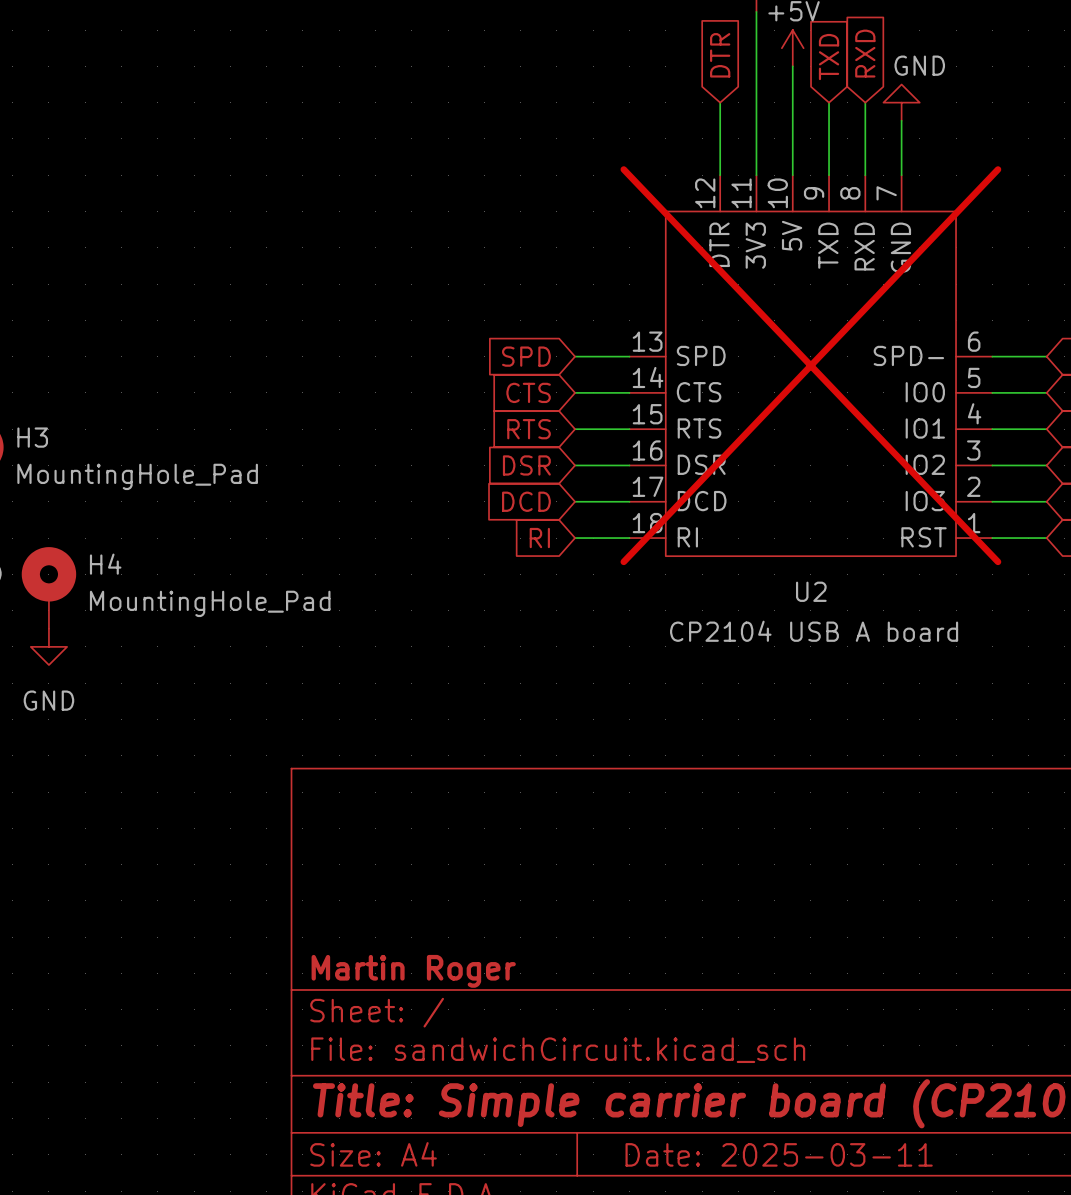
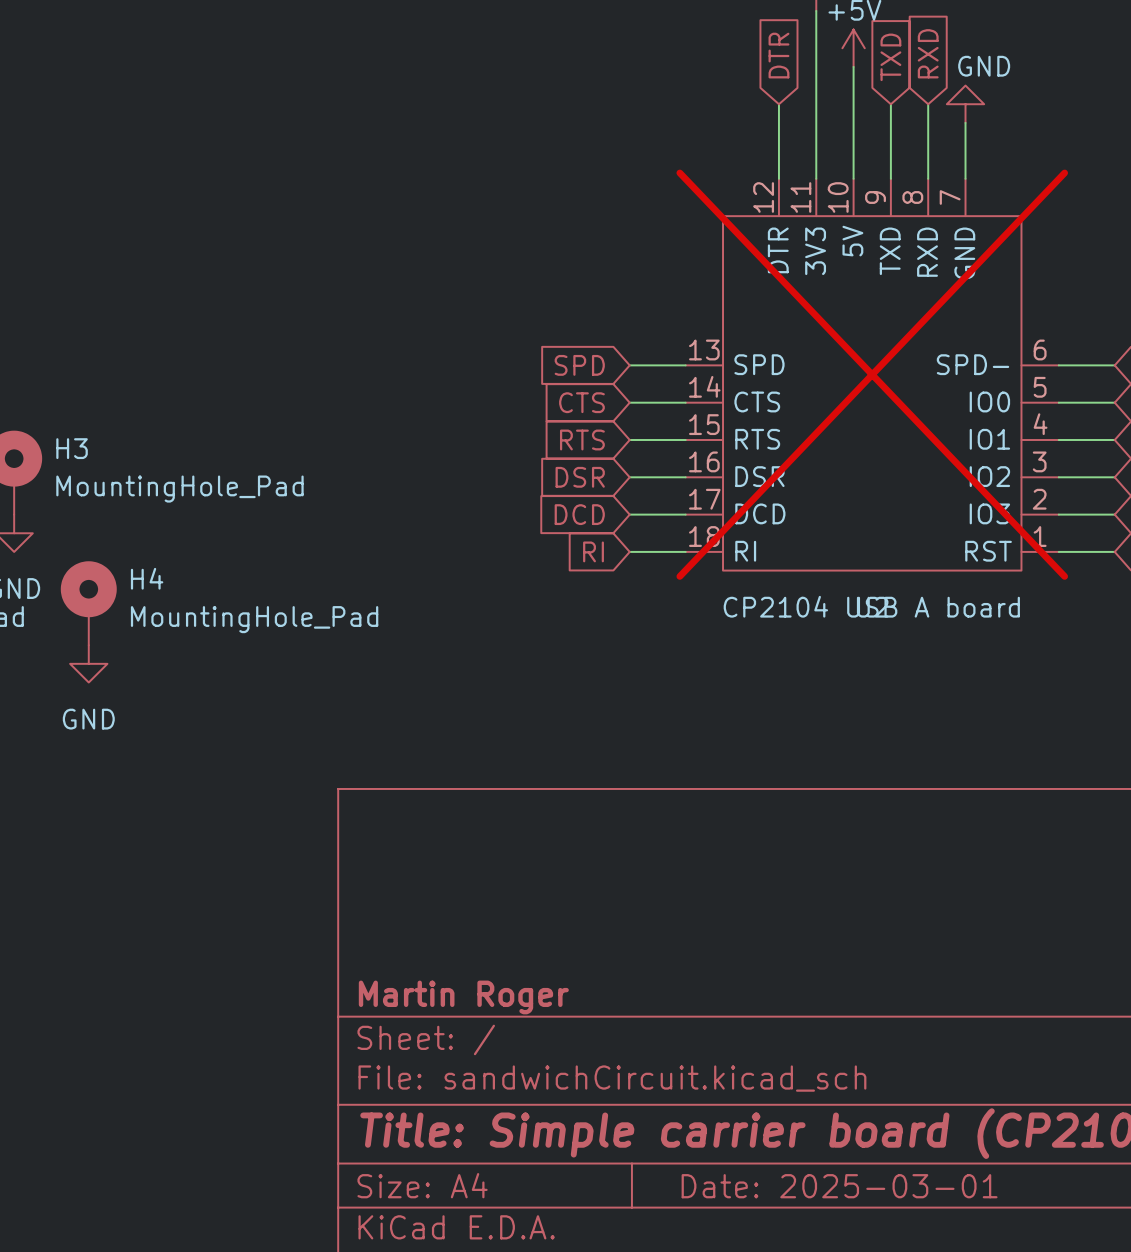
U2 value position: CP2104 USB A board (814, 631) -> CP2104 USB A board (871, 606)
title block: Date: 2025-03-11 (779, 1154) -> Date: 2025-03-01 (839, 1186)

